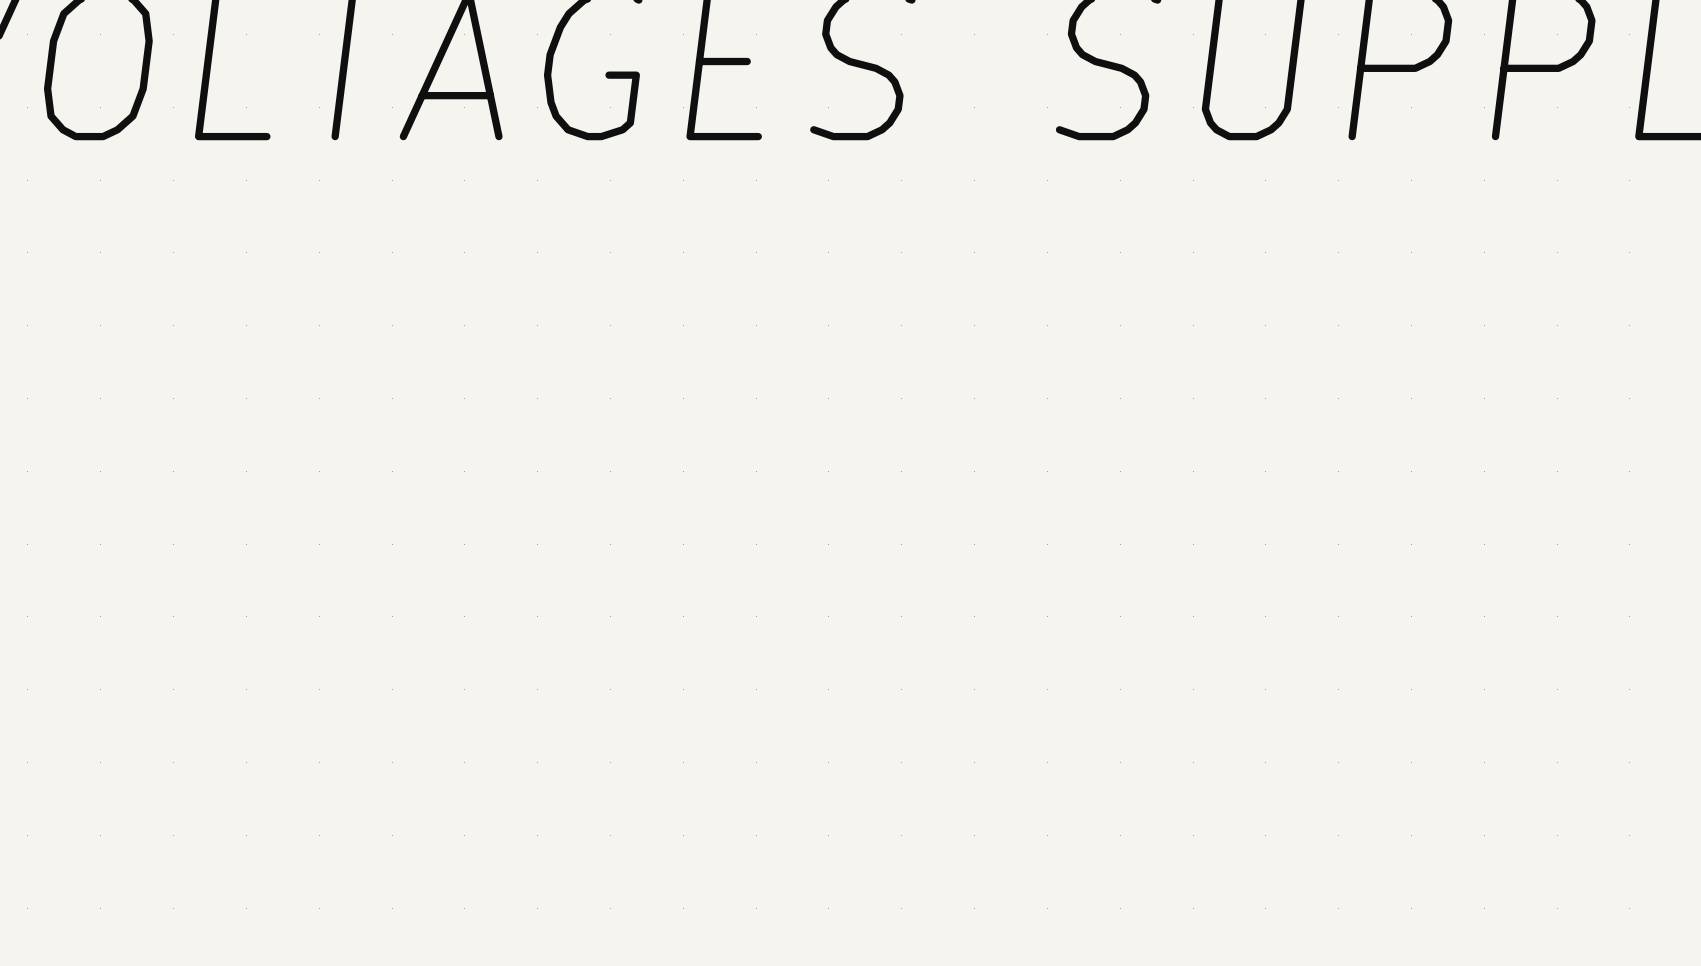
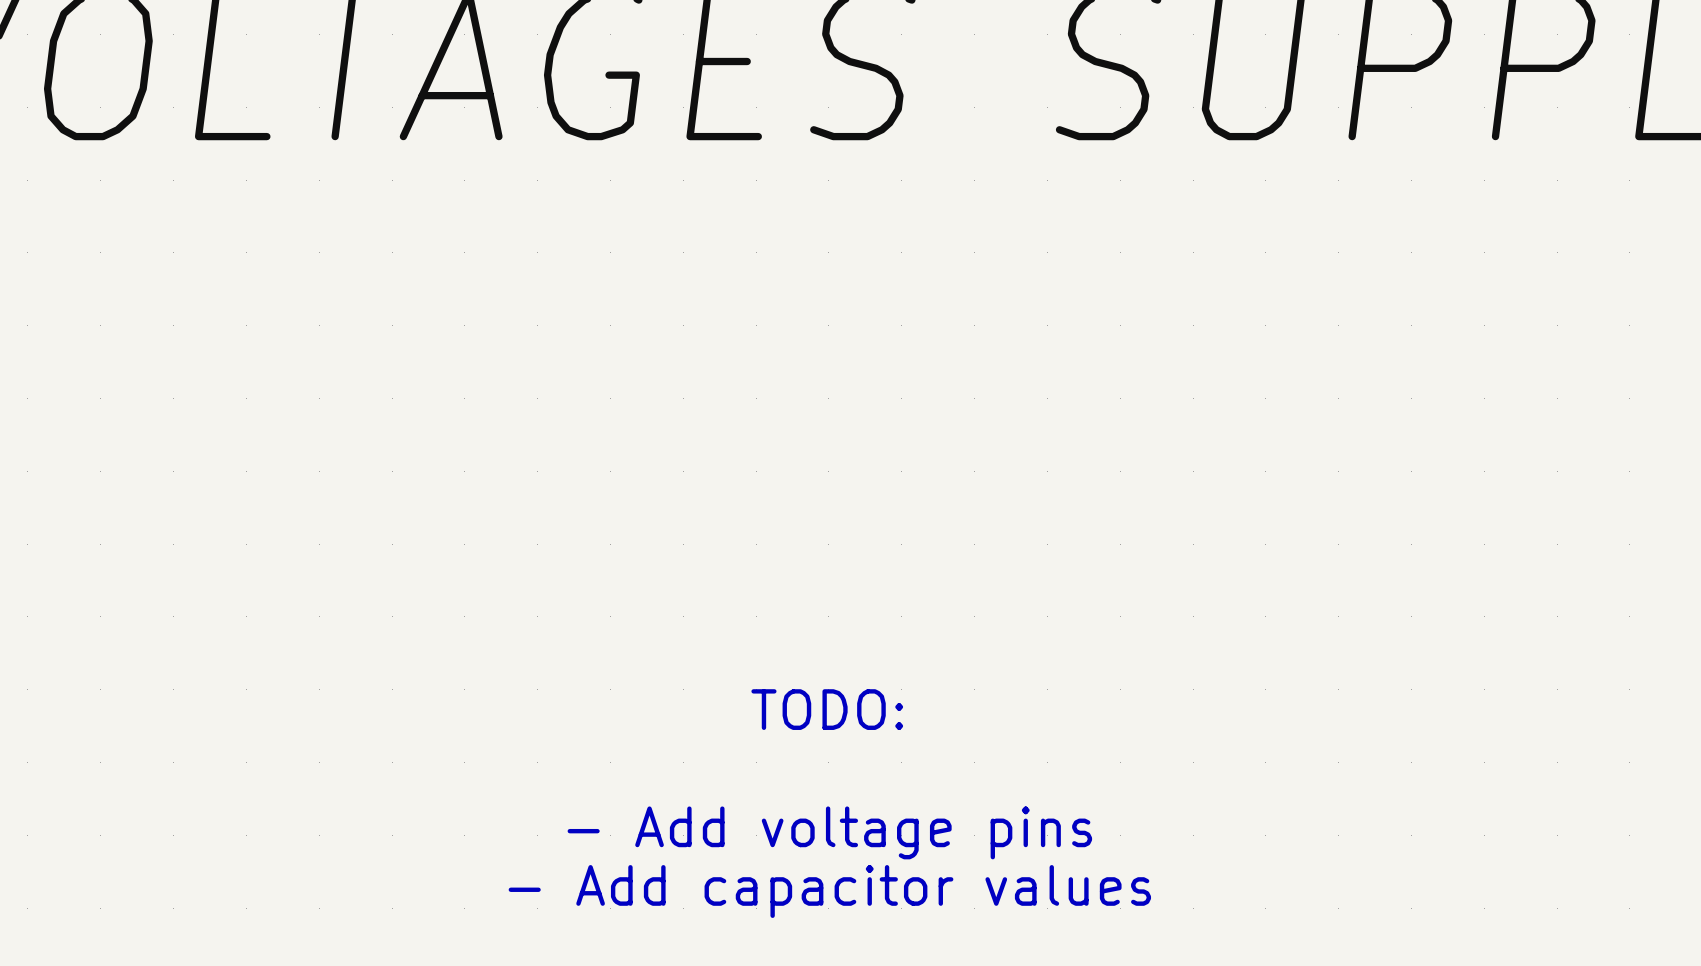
text: none -> TODO: (827, 709)
text: none -> - Add voltage pins (829, 832)
text: none -> - Add capacitor values (829, 891)

